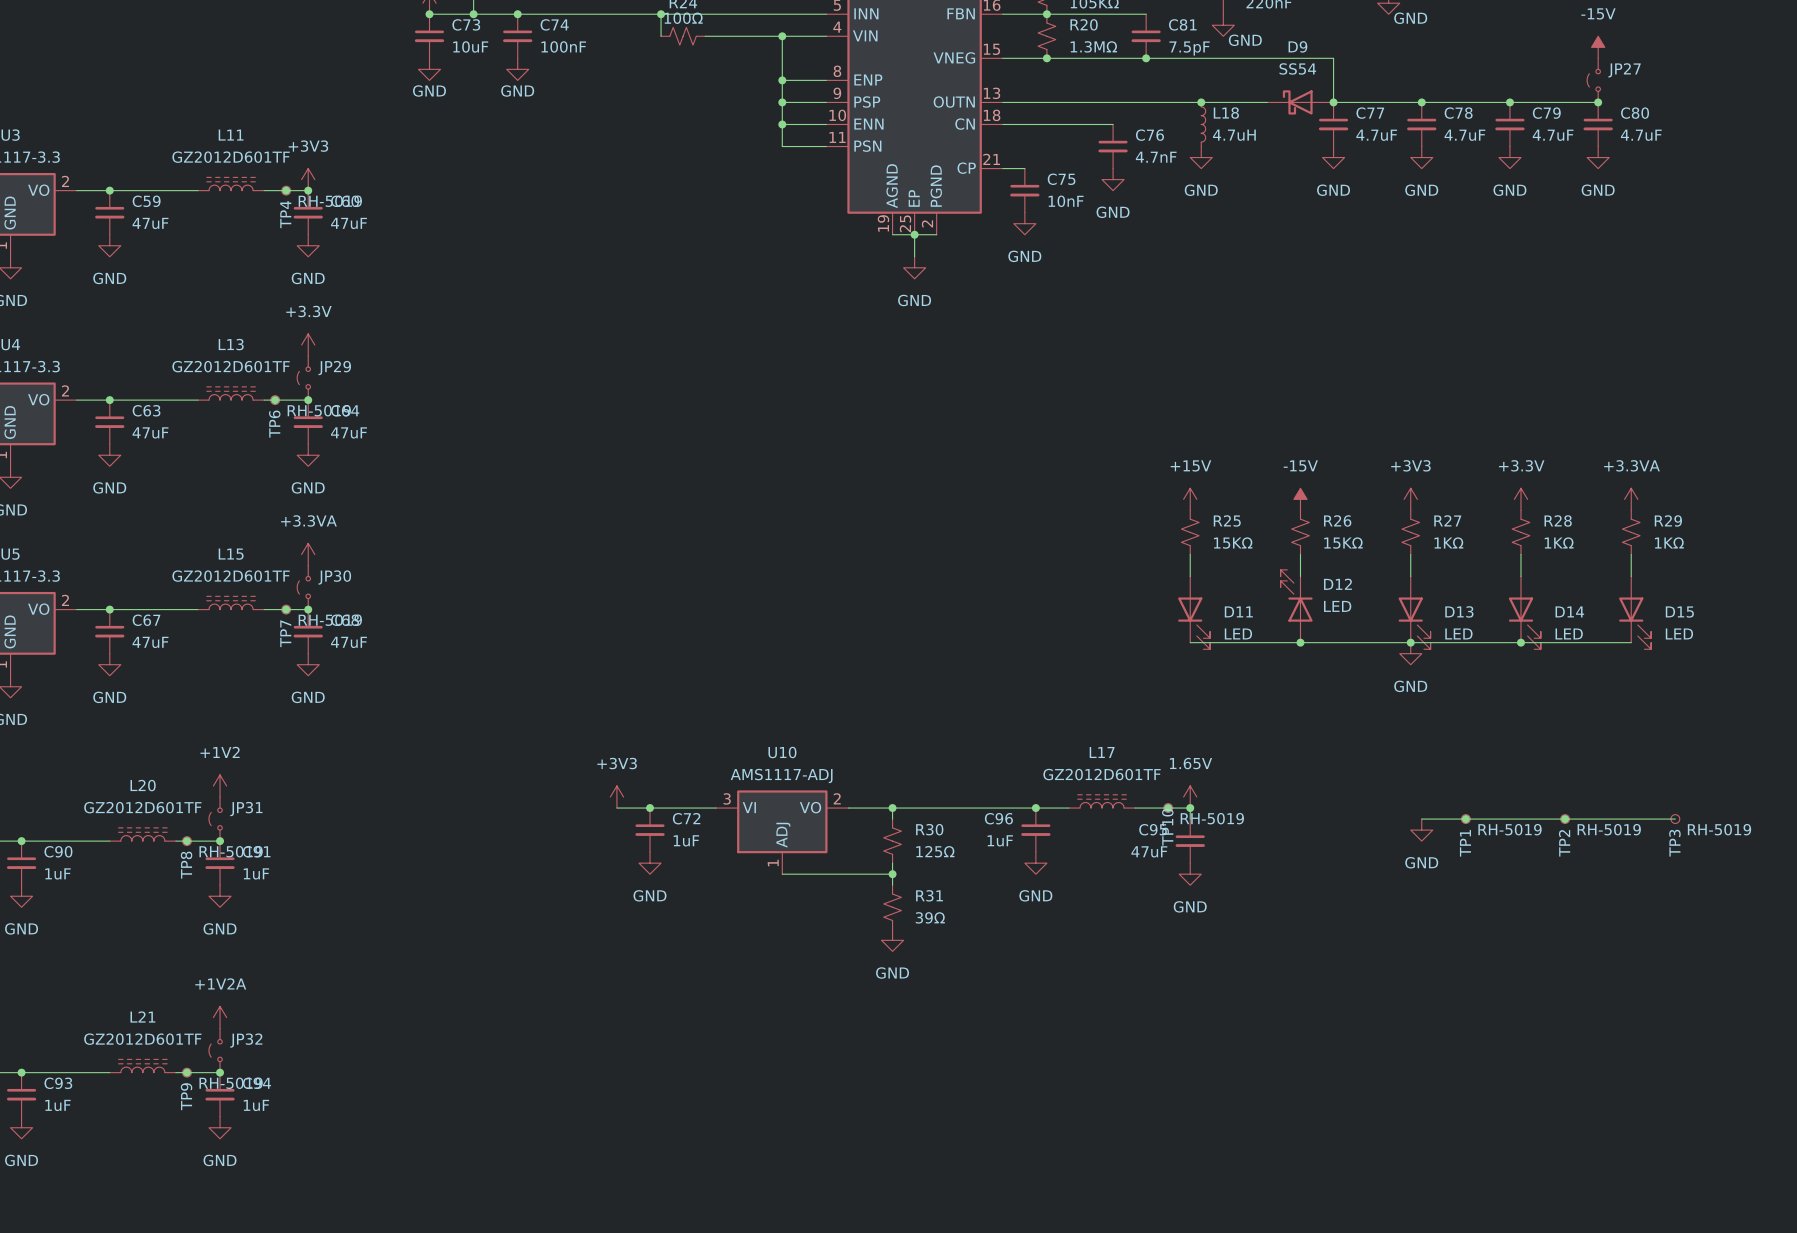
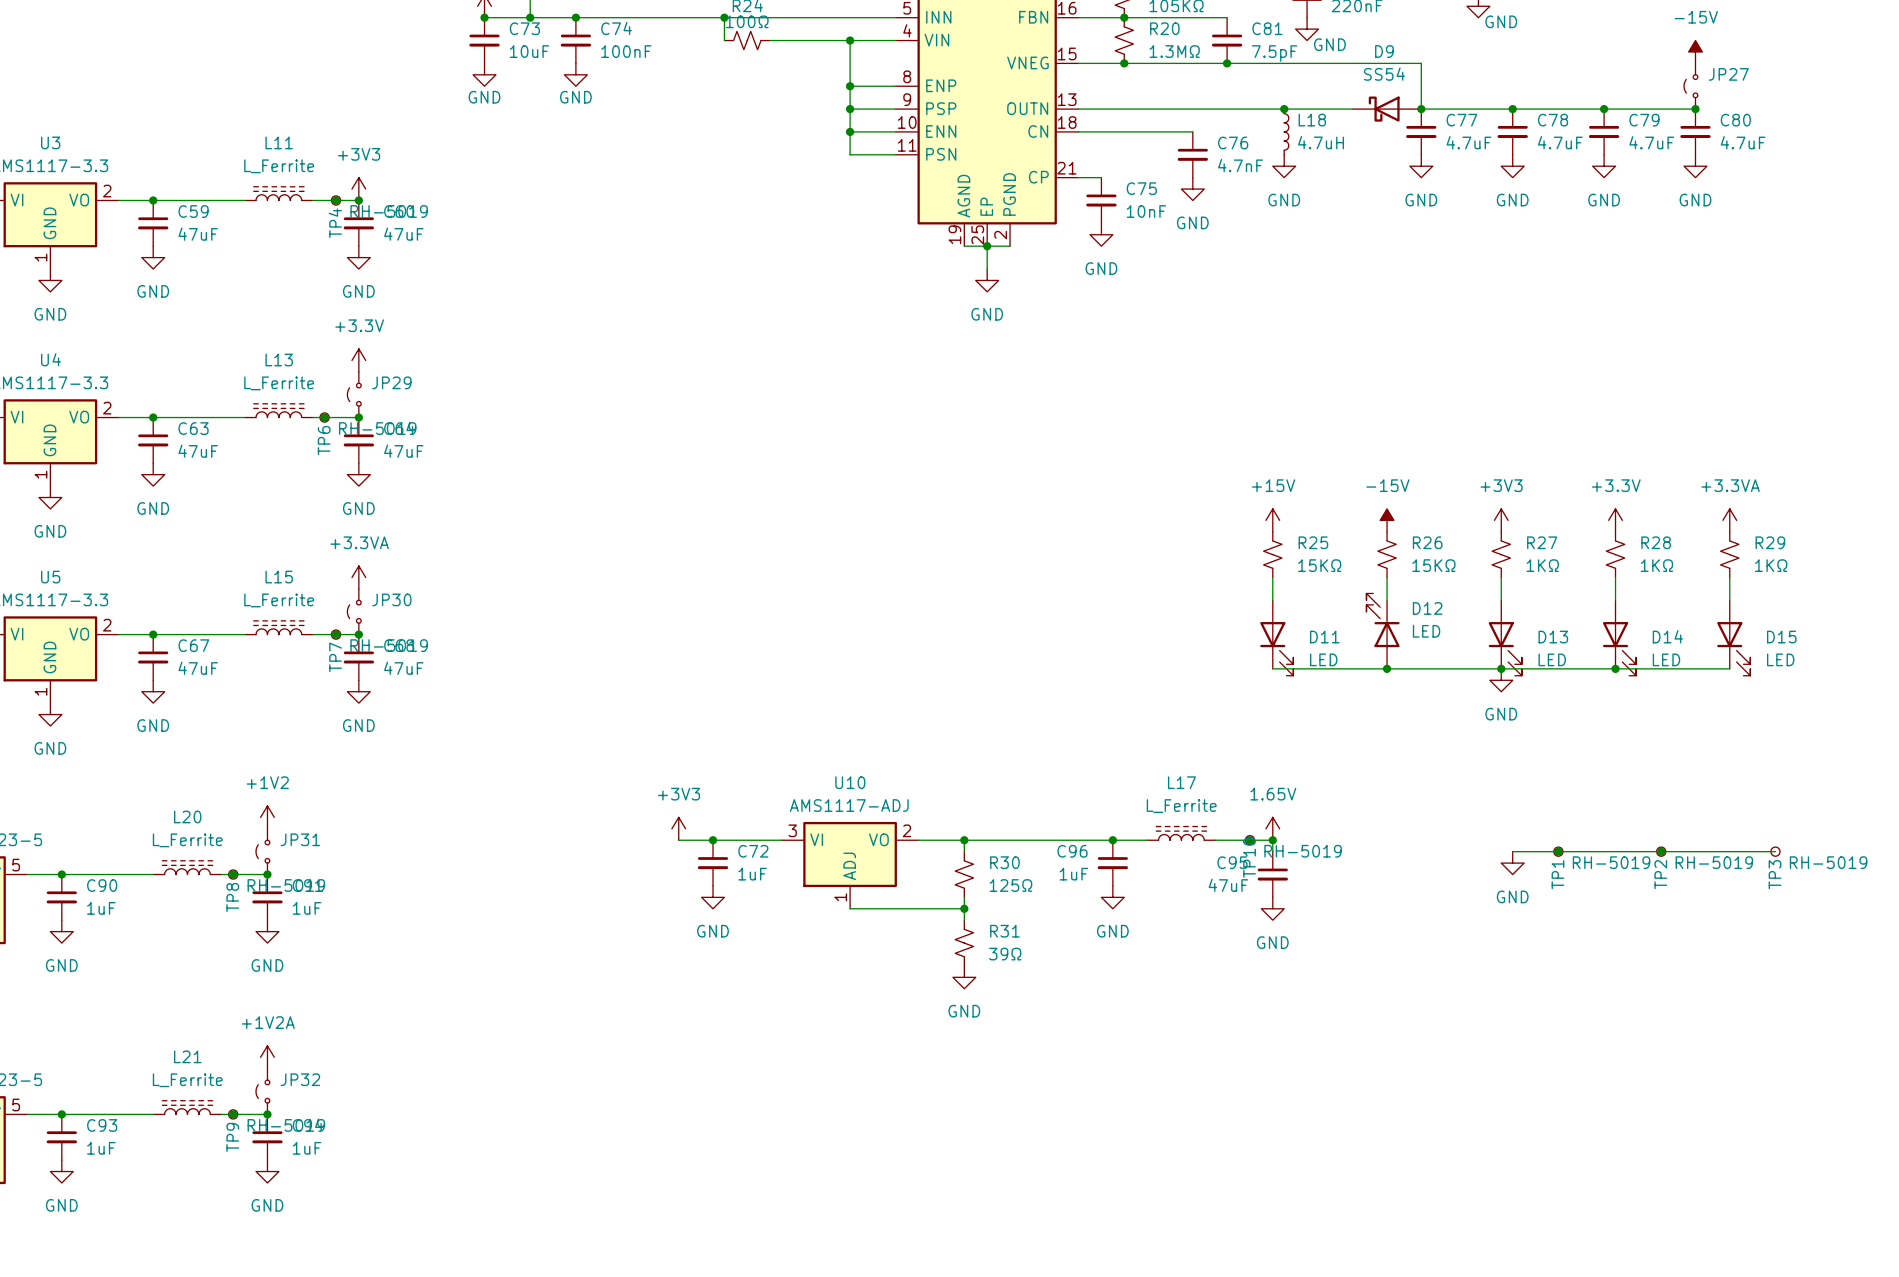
L11 value: GZ2012D601TF (231, 157) -> L_Ferrite (279, 166)
L13 value: GZ2012D601TF (231, 366) -> L_Ferrite (279, 383)
L15 value: GZ2012D601TF (231, 576) -> L_Ferrite (279, 600)
L17 value: GZ2012D601TF (1102, 774) -> L_Ferrite (1181, 806)
L20 value: GZ2012D601TF (142, 807) -> L_Ferrite (187, 840)
L21 value: GZ2012D601TF (142, 1039) -> L_Ferrite (187, 1080)

